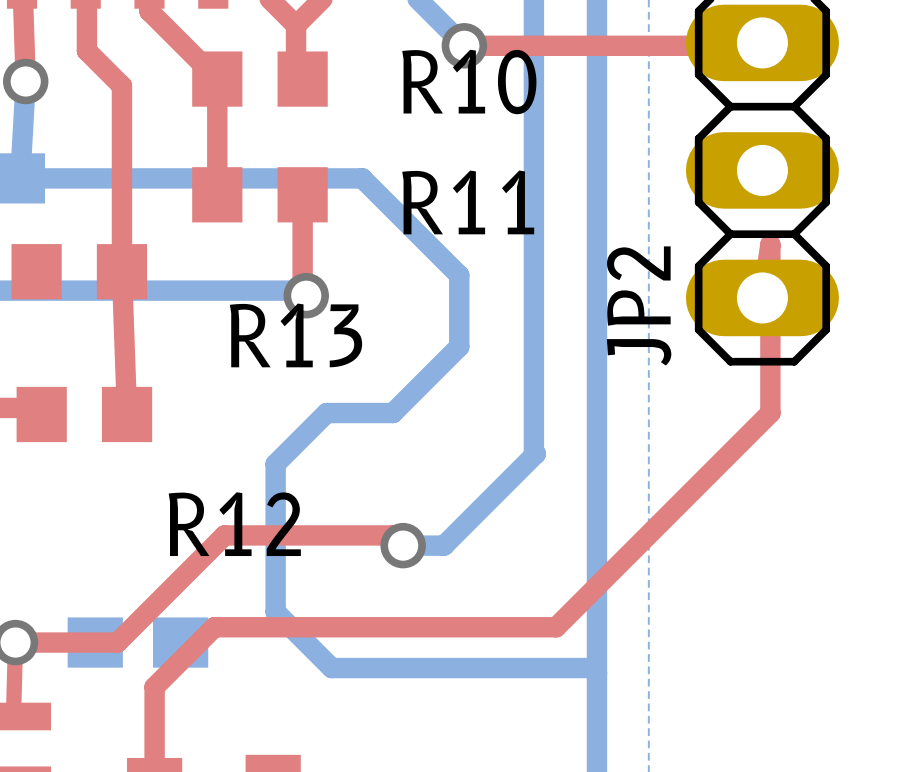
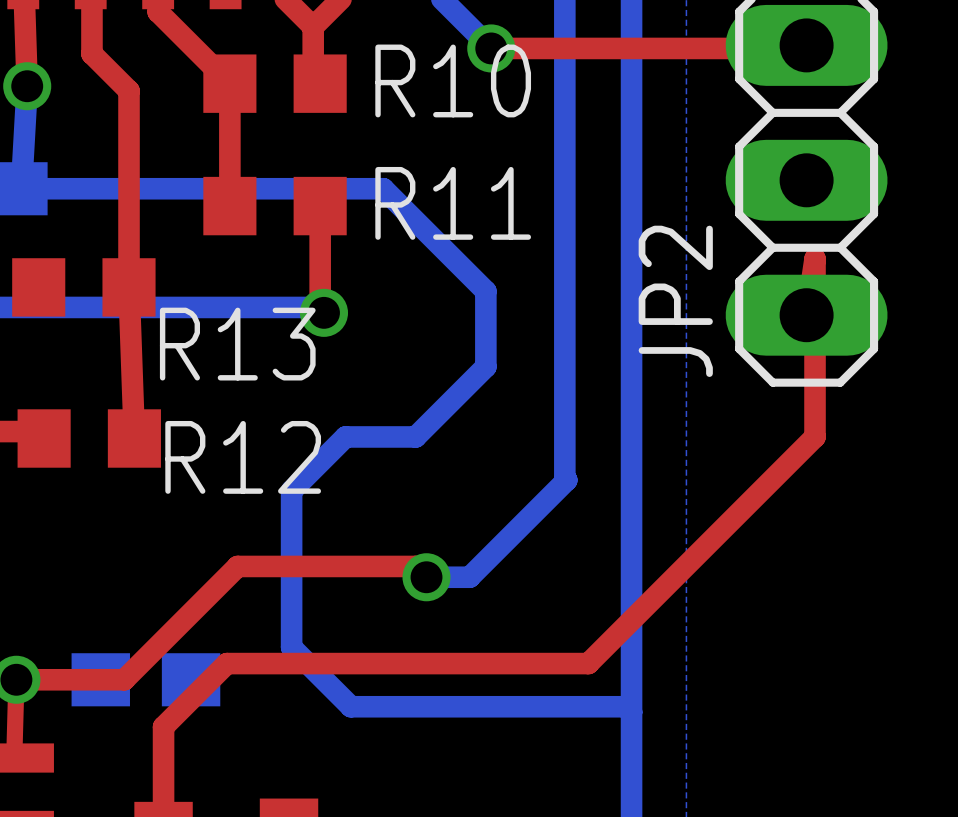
R10 name position: R10 (469, 81) -> R10 (453, 80)
R11 name position: R11 (468, 202) -> R11 (453, 203)
R13 name position: R13 (296, 335) -> R13 (237, 344)
R12 name position: R12 (234, 524) -> R12 (243, 457)

